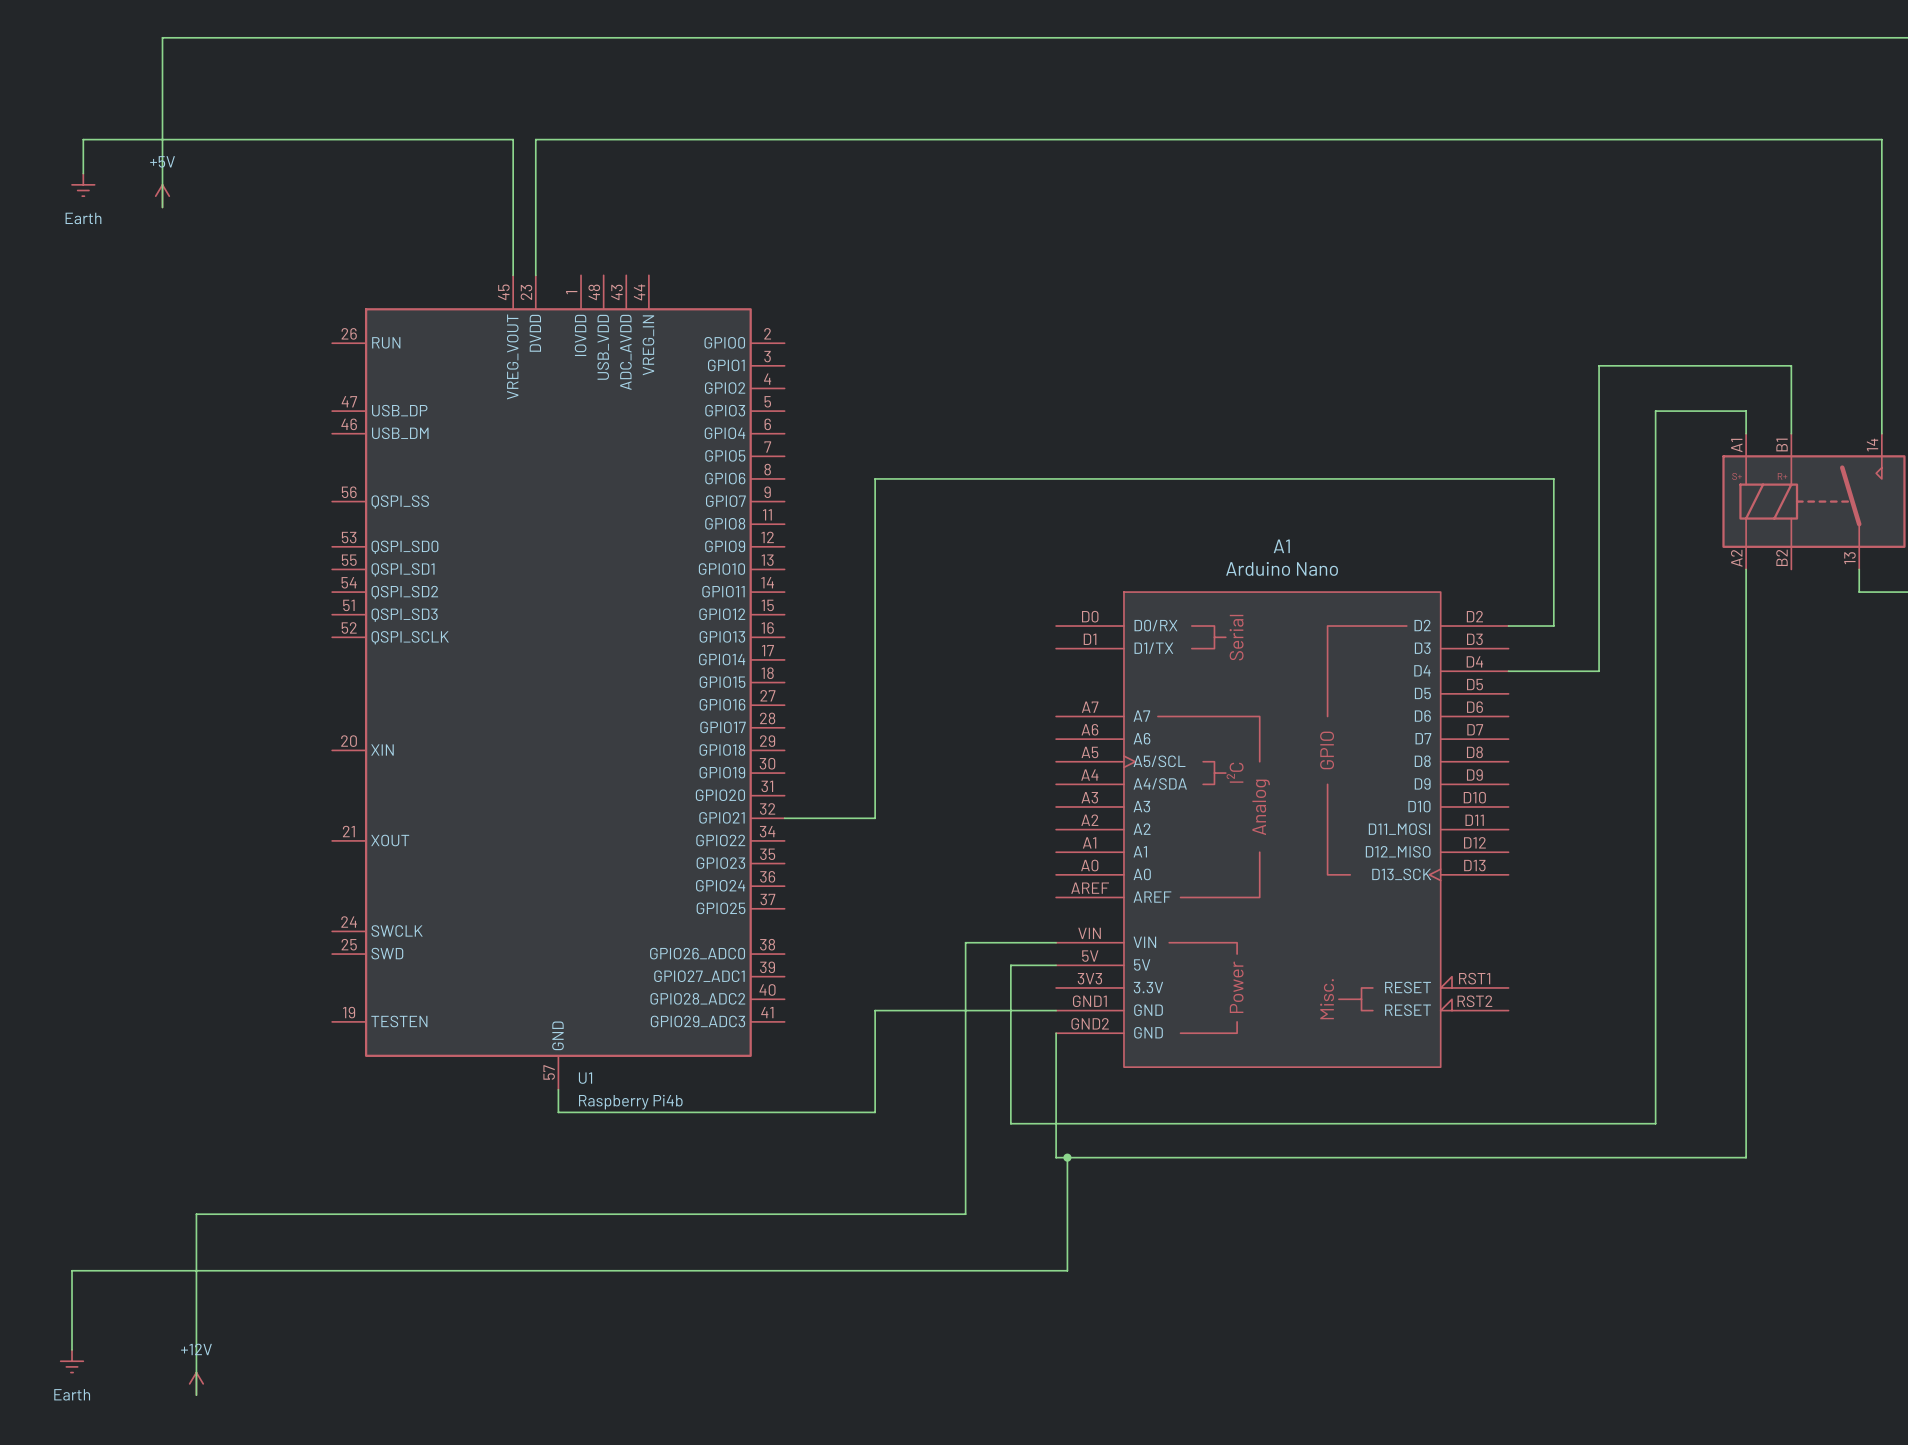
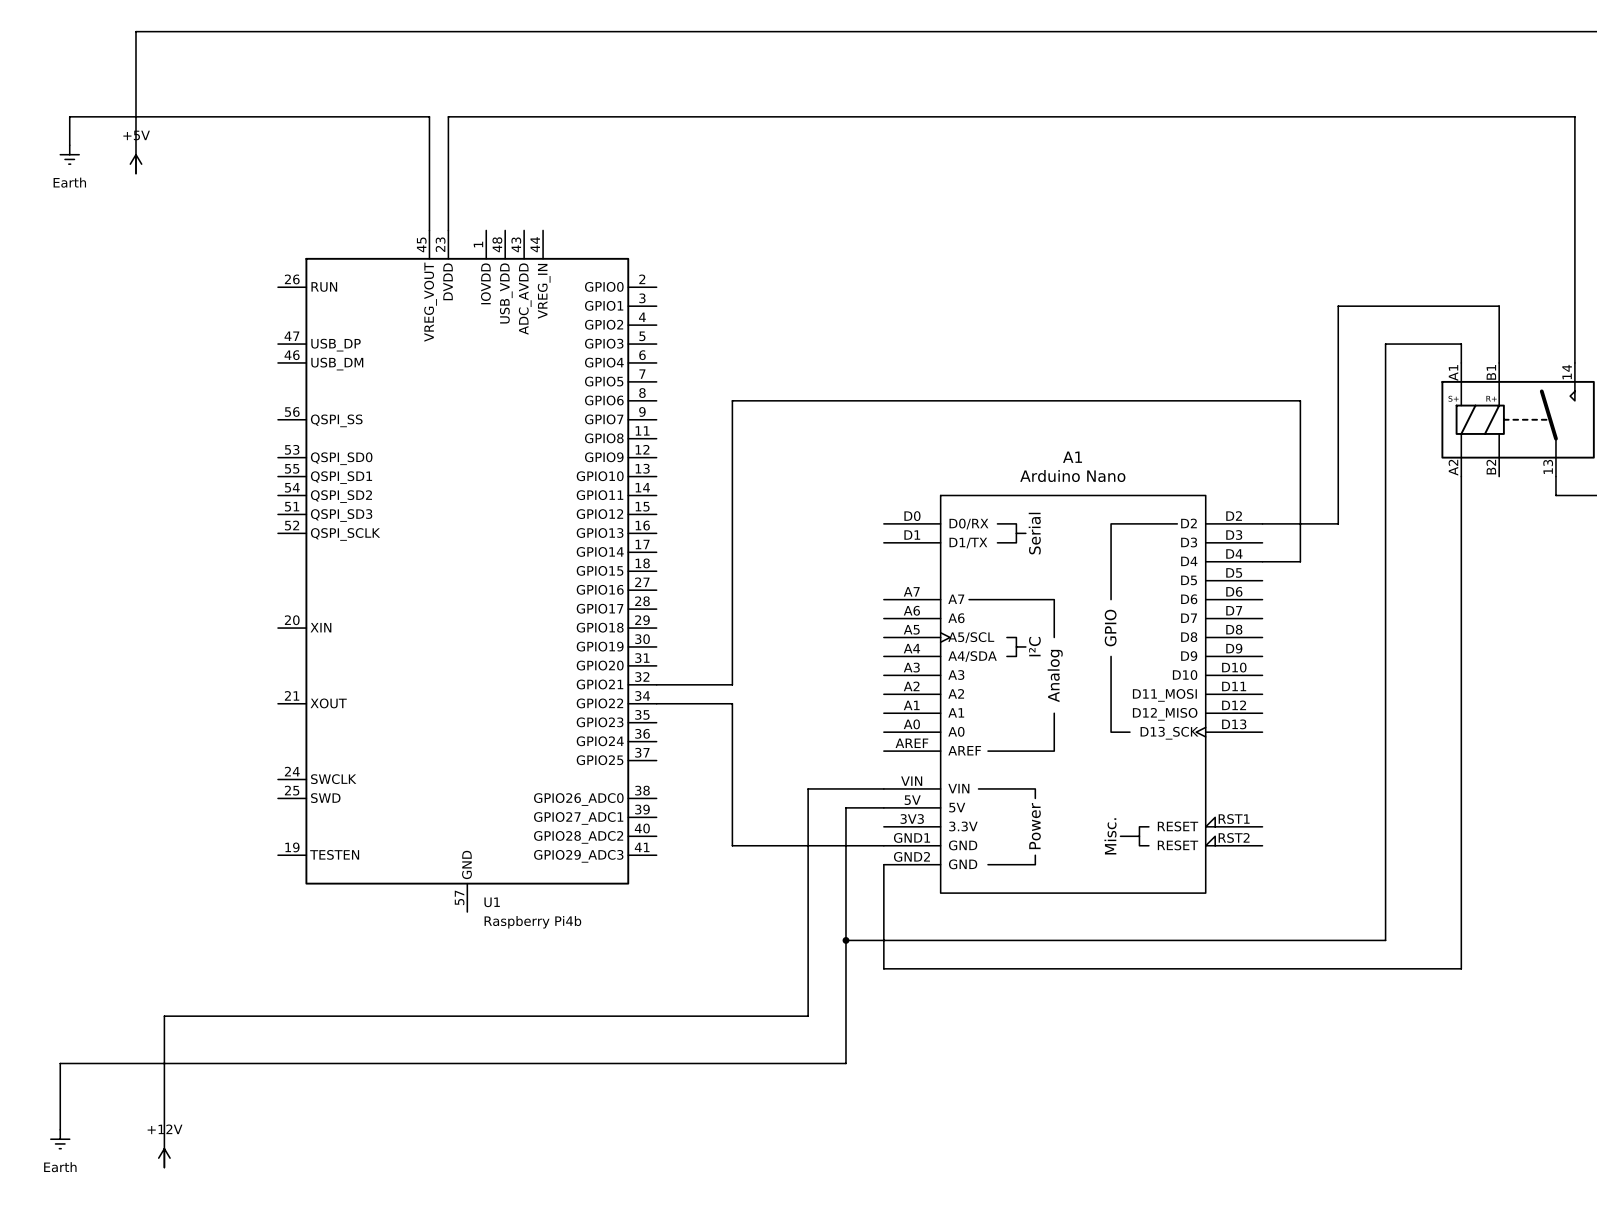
wire: (1599, 626) (1599, 671) (1553, 671) -> (1338, 523) (1300, 523) (1300, 561)
wire: (875, 1010) (875, 1112) (558, 1112) (558, 1089) -> (732, 845) (732, 703) (656, 703)
junction: none -> (845, 940)
wire: (1067, 1157) (1067, 1270) (1010, 1270) -> (845, 940) (845, 1063)
junction: (1067, 1157) -> none

